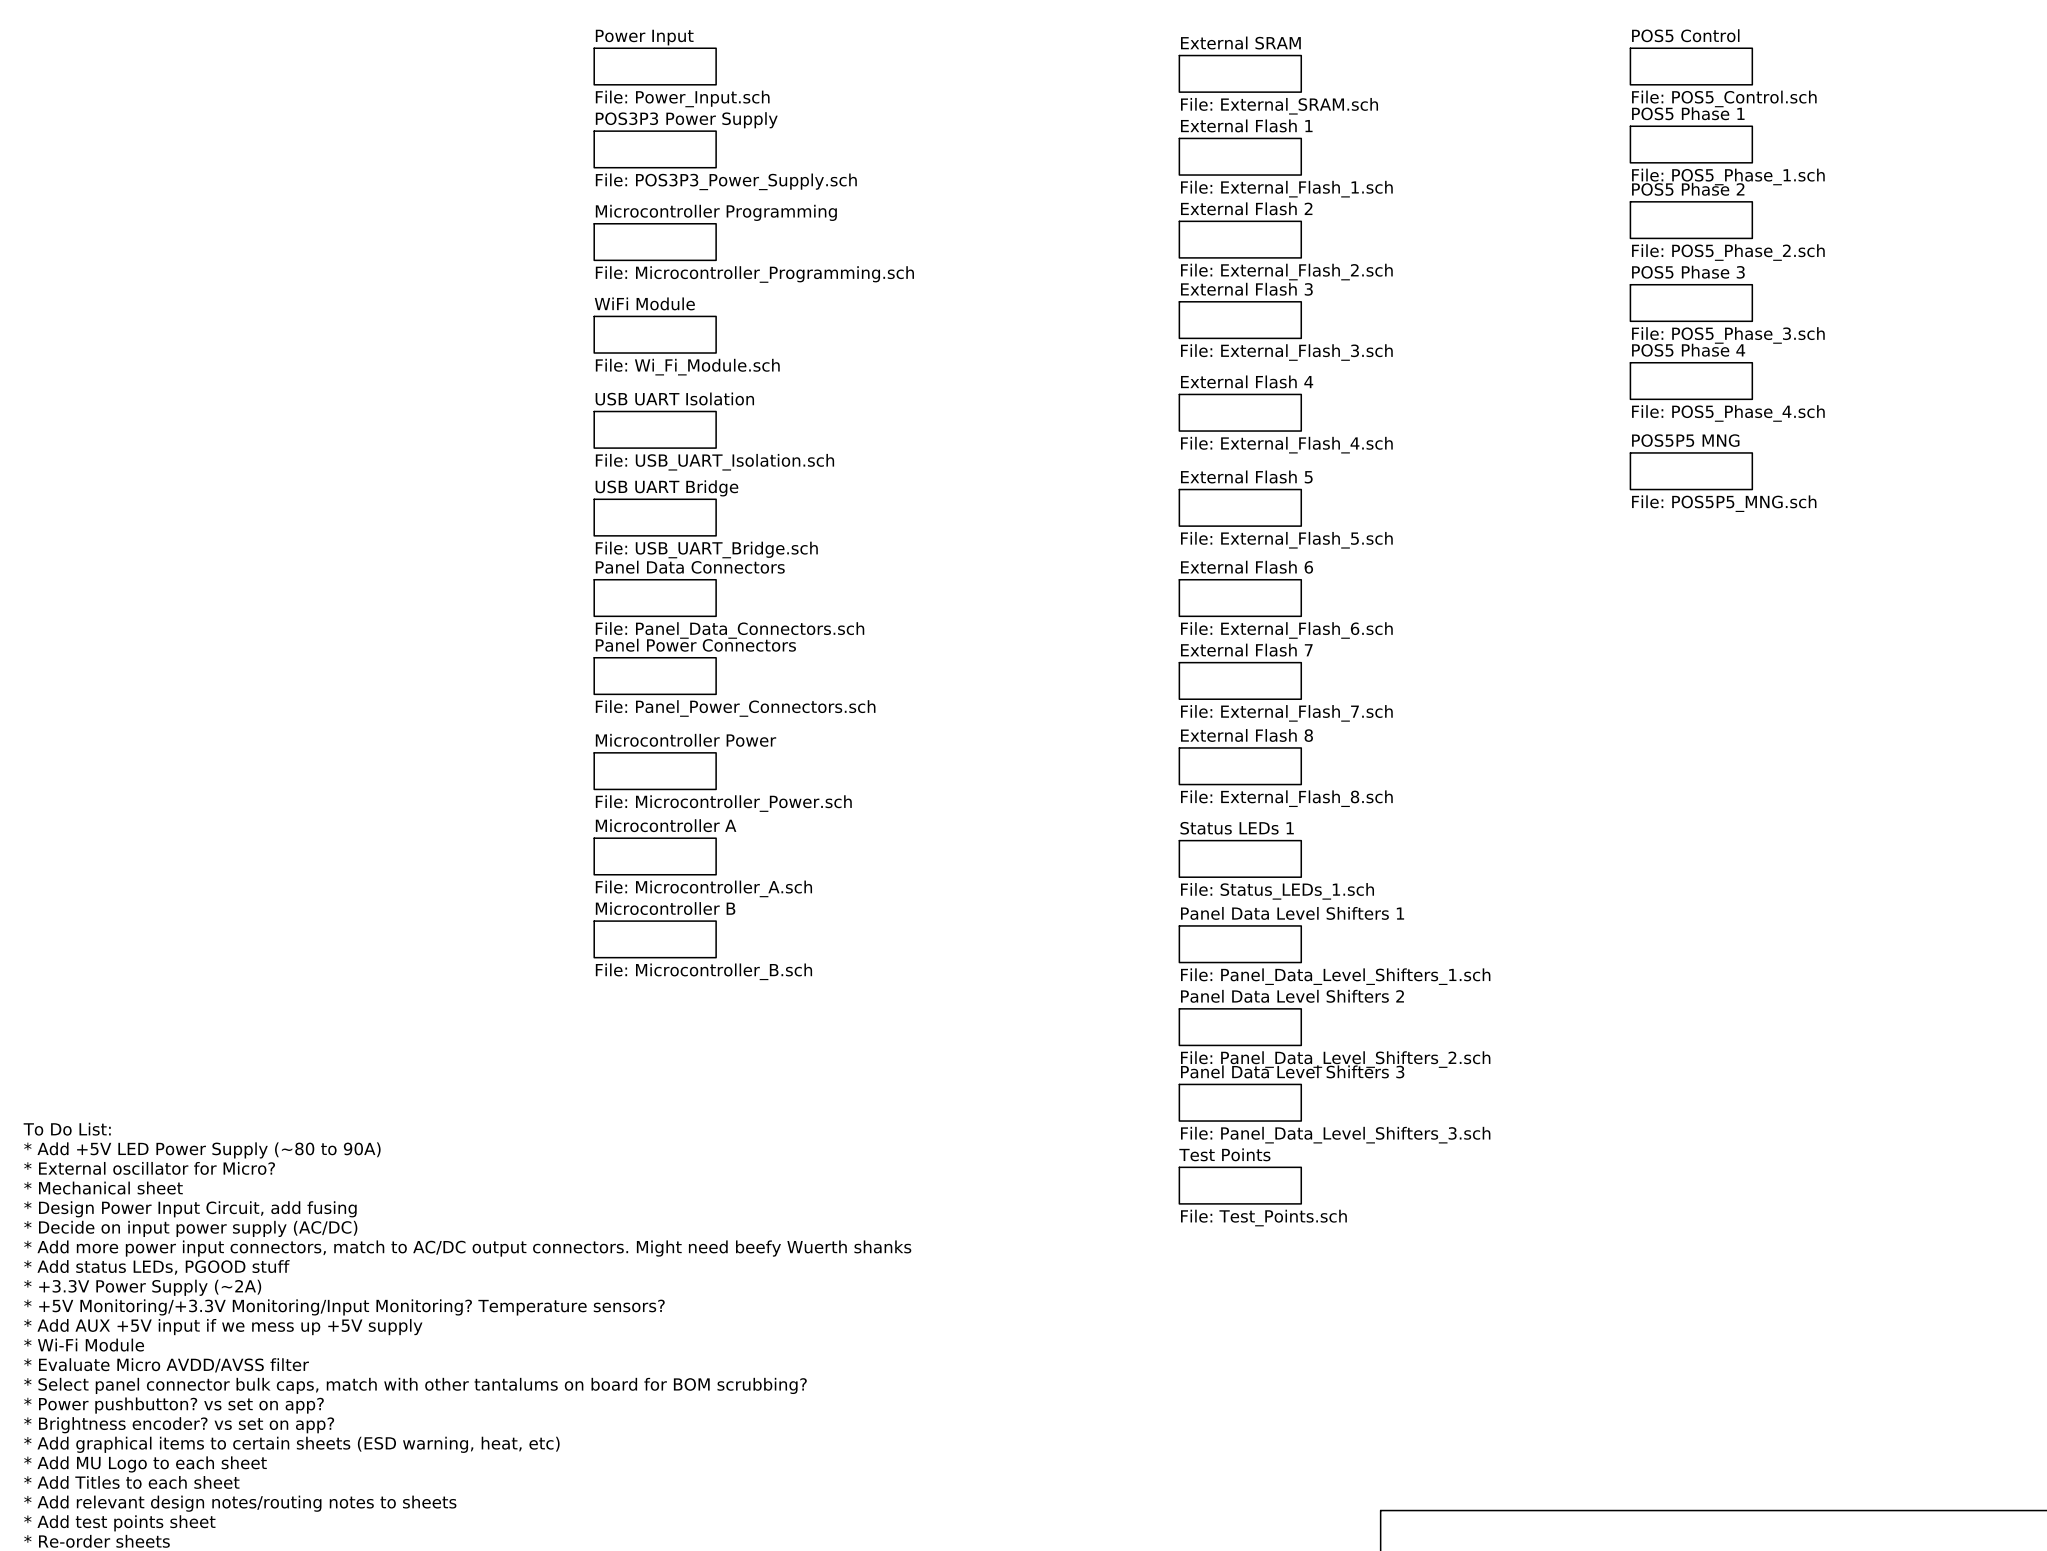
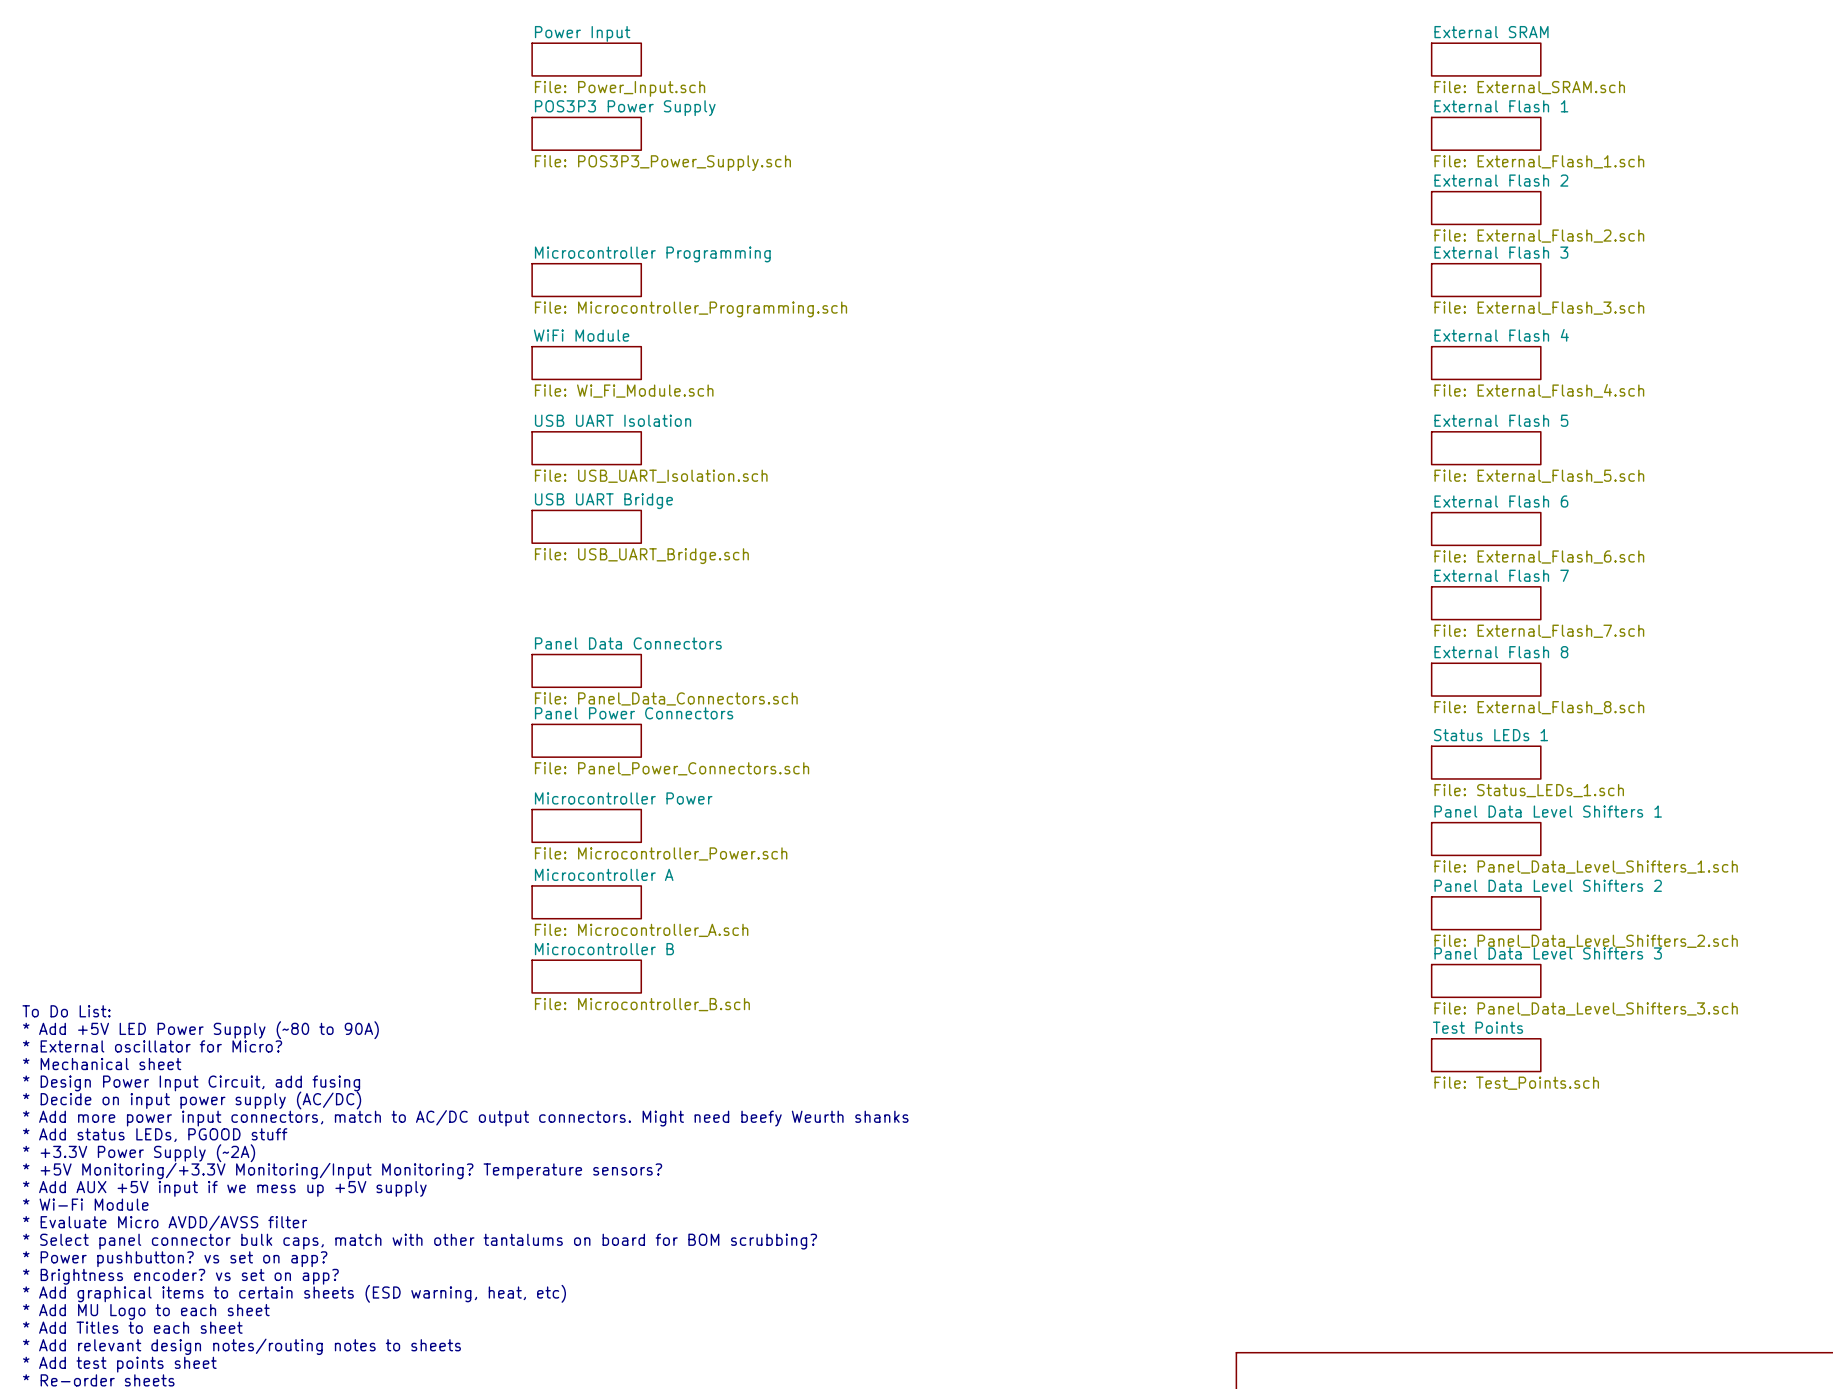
sheet External SRAM: none -> File: External_SRAM.sch (1486, 59)
sheet POS5 Control: File: POS5_Control.sch (1691, 66) -> none
sheet External SRAM: File: External_SRAM.sch (1240, 73) -> none
sheet POS5 Phase 1: File: POS5_Phase_1.sch (1691, 144) -> none
sheet External Flash 1 position: (1240, 156) -> (1486, 133)
sheet POS5 Phase 2: File: POS5_Phase_2.sch (1691, 220) -> none
sheet External Flash 2 position: (1240, 239) -> (1486, 208)
sheet Microcontroller Programming position: (655, 242) -> (586, 280)
sheet POS5 Phase 3: File: POS5_Phase_3.sch (1691, 303) -> none
sheet External Flash 3 position: (1240, 320) -> (1486, 280)
sheet WiFi Module position: (655, 334) -> (586, 363)
sheet POS5 Phase 4: File: POS5_Phase_4.sch (1691, 381) -> none
sheet External Flash 4 position: (1240, 412) -> (1486, 363)
sheet USB UART Isolation position: (655, 429) -> (586, 448)
sheet POS5P5 MNG: File: POS5P5_MNG.sch (1691, 471) -> none
sheet External Flash 5 position: (1240, 507) -> (1486, 448)
sheet USB UART Bridge position: (655, 517) -> (586, 526)
sheet Panel Data Connectors position: (655, 598) -> (586, 670)
sheet External Flash 6 position: (1240, 598) -> (1486, 528)
sheet Panel Power Connectors position: (655, 676) -> (586, 740)
sheet External Flash 7 position: (1240, 680) -> (1486, 603)
sheet External Flash 8 position: (1240, 766) -> (1486, 679)
sheet Microcontroller Power position: (655, 771) -> (586, 825)
sheet Microcontroller A position: (655, 856) -> (586, 902)
sheet Status LEDs 1 position: (1240, 858) -> (1486, 762)
sheet Microcontroller B position: (655, 939) -> (586, 976)
sheet Panel Data Level Shifters 1 position: (1240, 944) -> (1486, 839)
sheet Panel Data Level Shifters 2 position: (1240, 1027) -> (1486, 913)
sheet Panel Data Level Shifters 3 position: (1240, 1102) -> (1486, 980)
sheet Test Points: none -> File: Test_Points.sch (1486, 1055)
sheet Test Points: File: Test_Points.sch (1240, 1185) -> none
text: * Add more power input connectors, match to AC/DC output connectors. Might need beefy Wuerth shanks (467, 1248) -> * Add more power input connectors, match to AC/DC output connectors. Might need beefy Weurth shanks (465, 1118)

